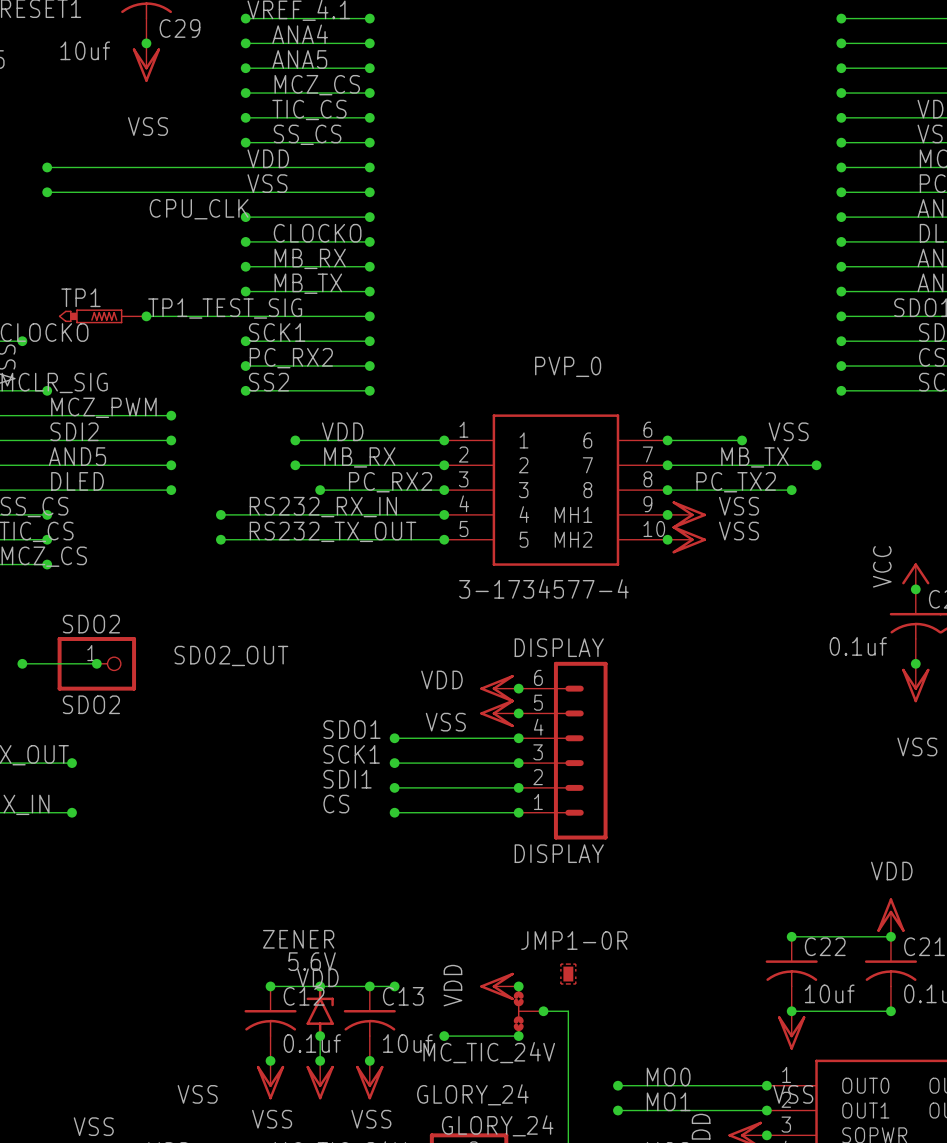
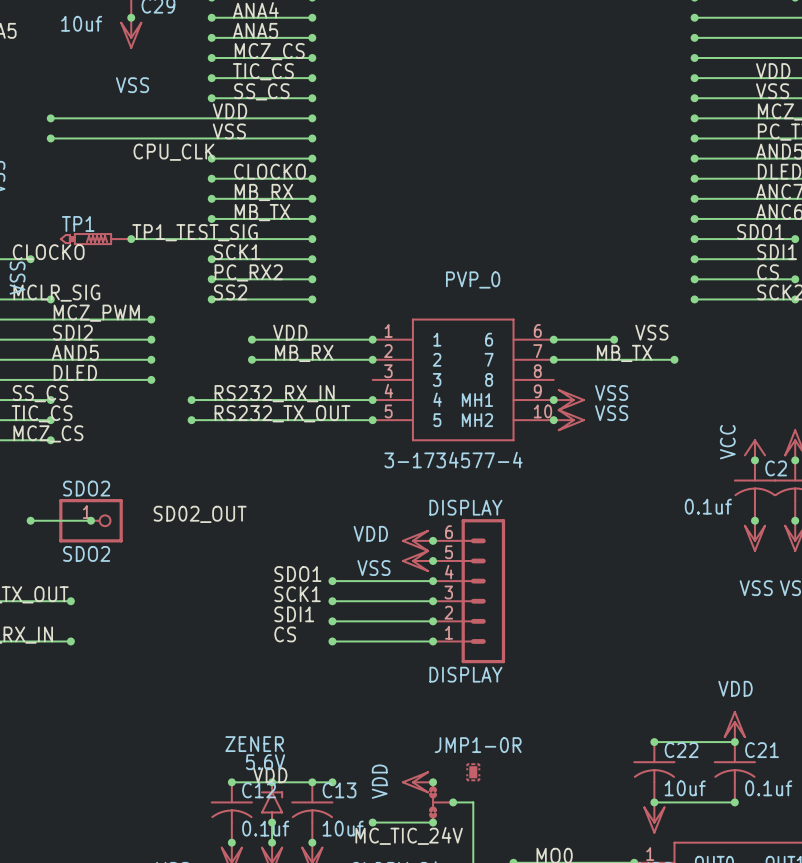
label: PC_RX2 (390, 482) -> none
label: PC_TX2 (736, 482) -> none
wire: (320, 490) (444, 490) -> none
junction: (320, 490) -> none
junction: (444, 490) -> none
wire: (667, 490) (791, 490) -> none
junction: (667, 490) -> none
junction: (791, 490) -> none

